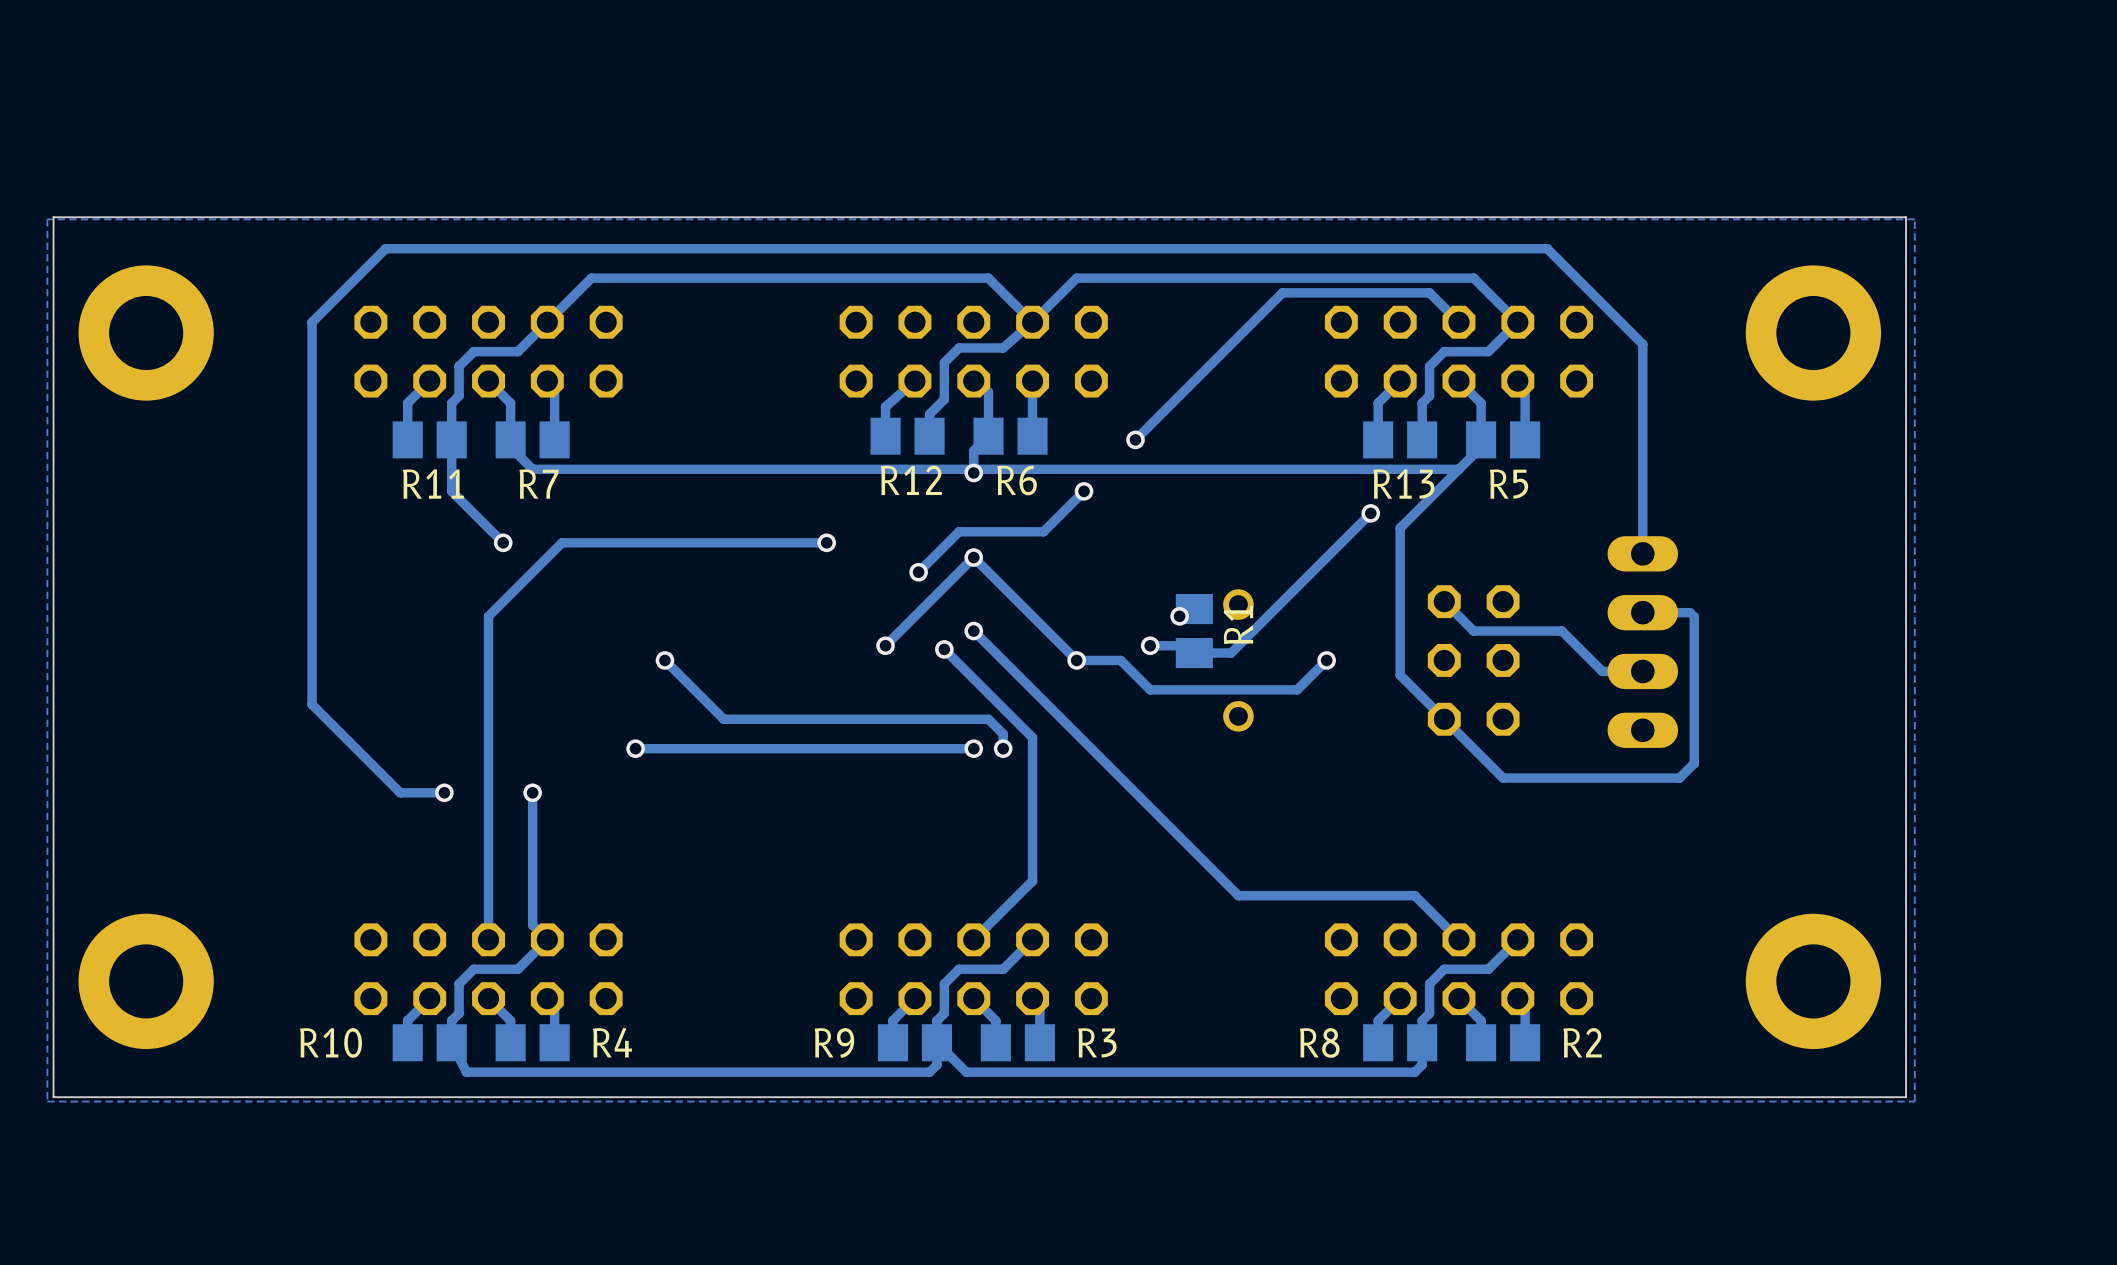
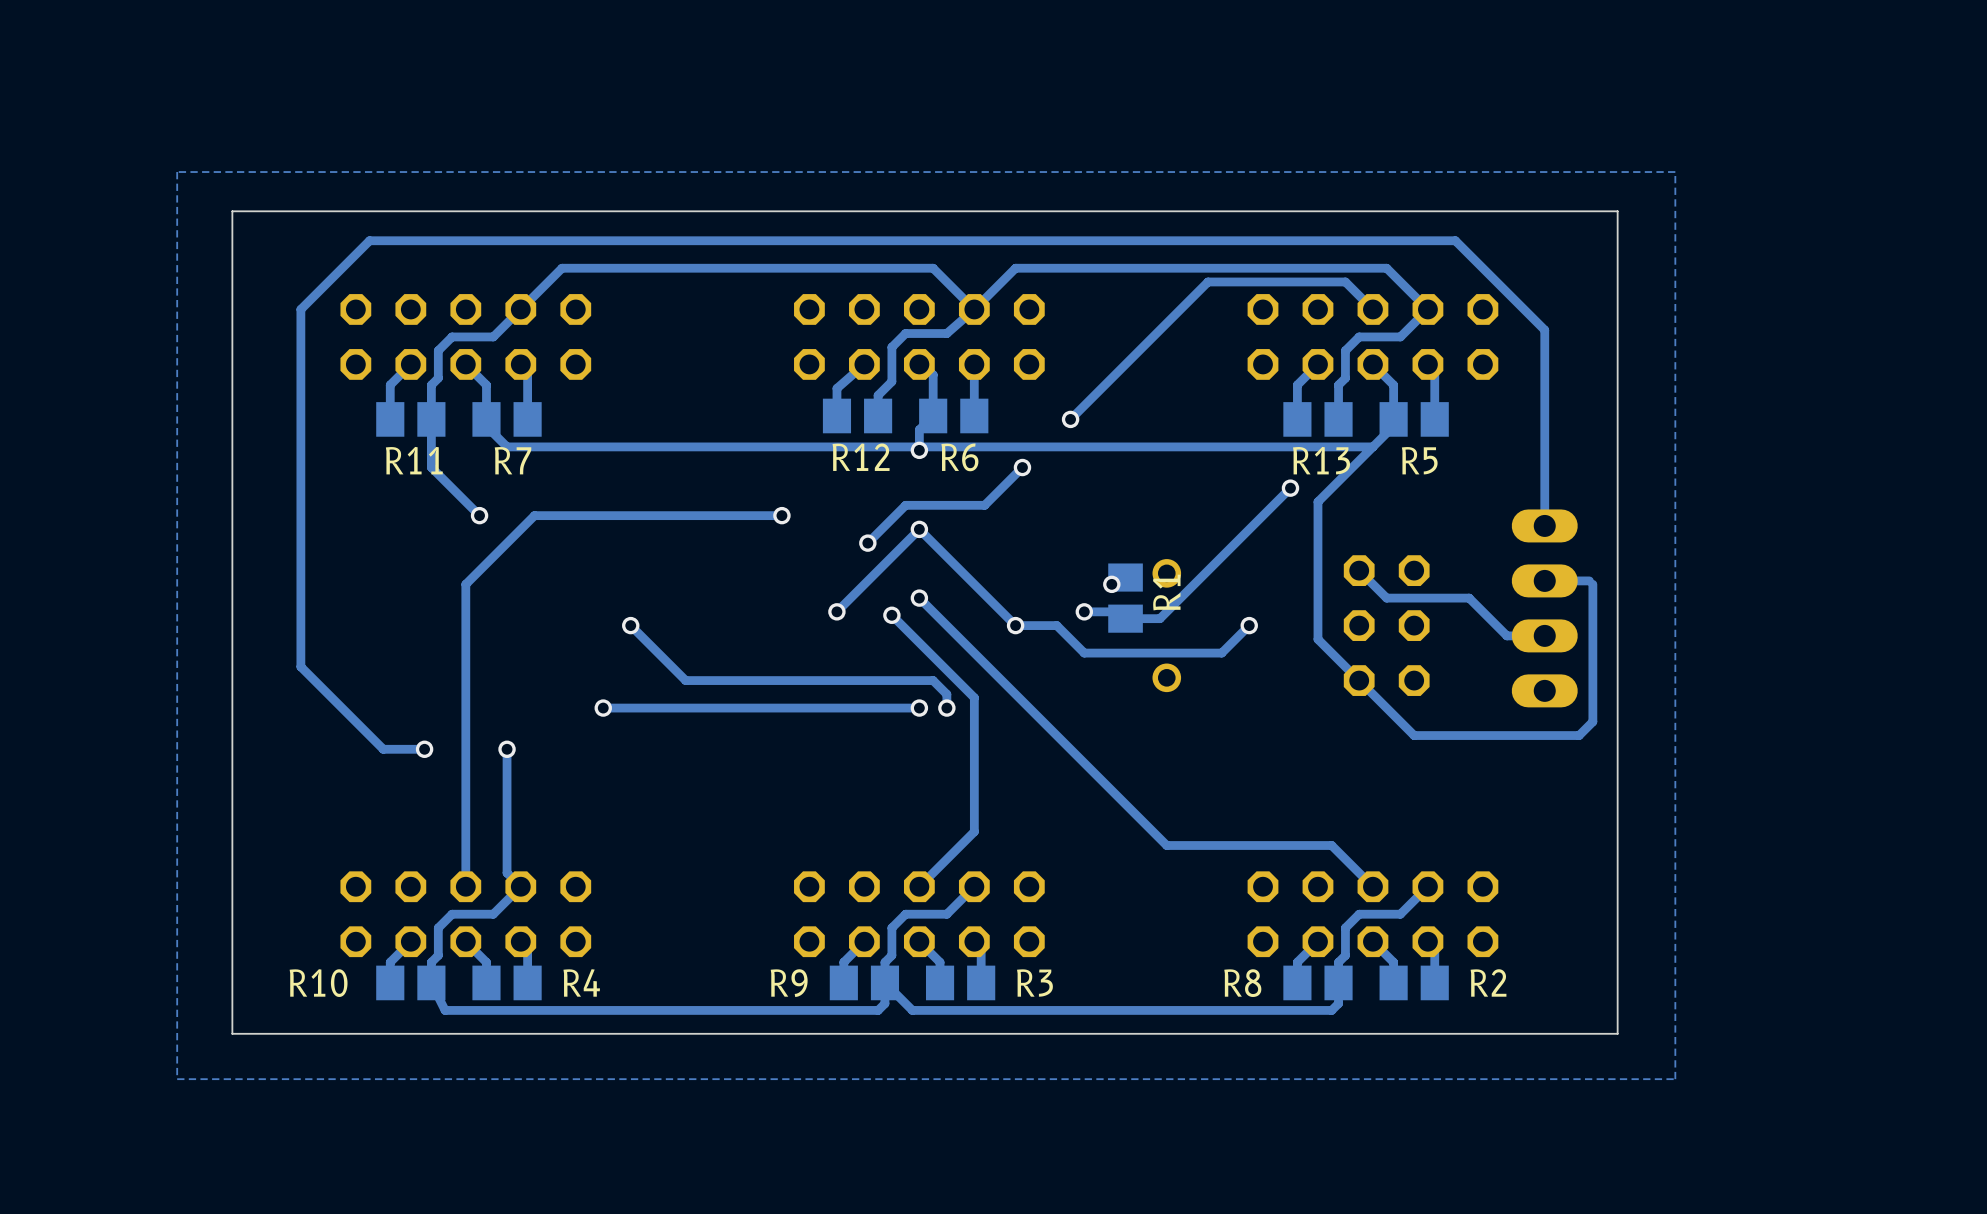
board edge: (238, 217) (53, 217) (53, 1097) (238, 1097) -> (232, 211) (232, 1033)
board edge: (1720, 217) (1906, 217) (1906, 1097) (1720, 1097) -> (1617, 211) (1617, 1033)
zone outline: (1914, 219) (47, 219) (47, 1101) (1914, 1101) (1914, 219) -> (1675, 172) (1675, 1079) (177, 1079) (177, 172) (1675, 172)
part: (146, 333) -> none
part: (1813, 333) -> none
part: (146, 981) -> none
part: (1813, 981) -> none

